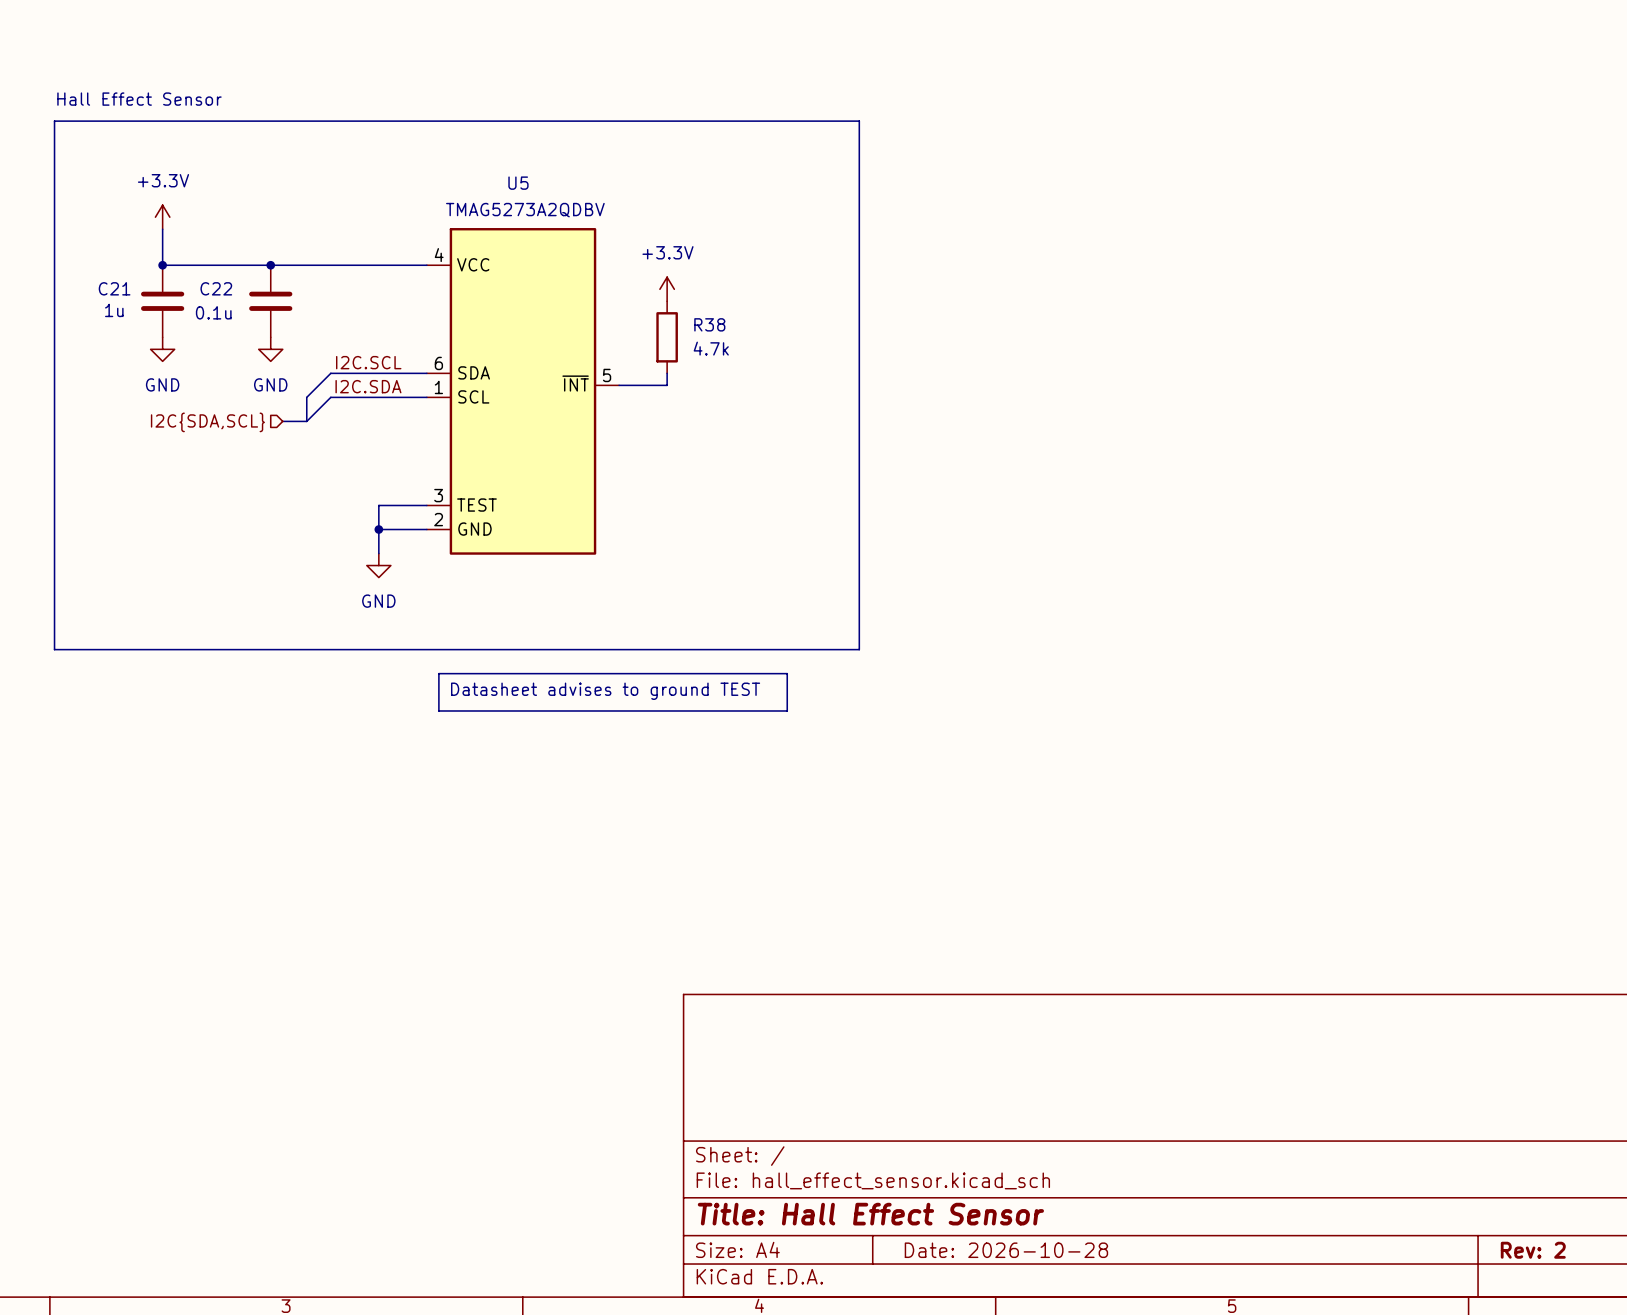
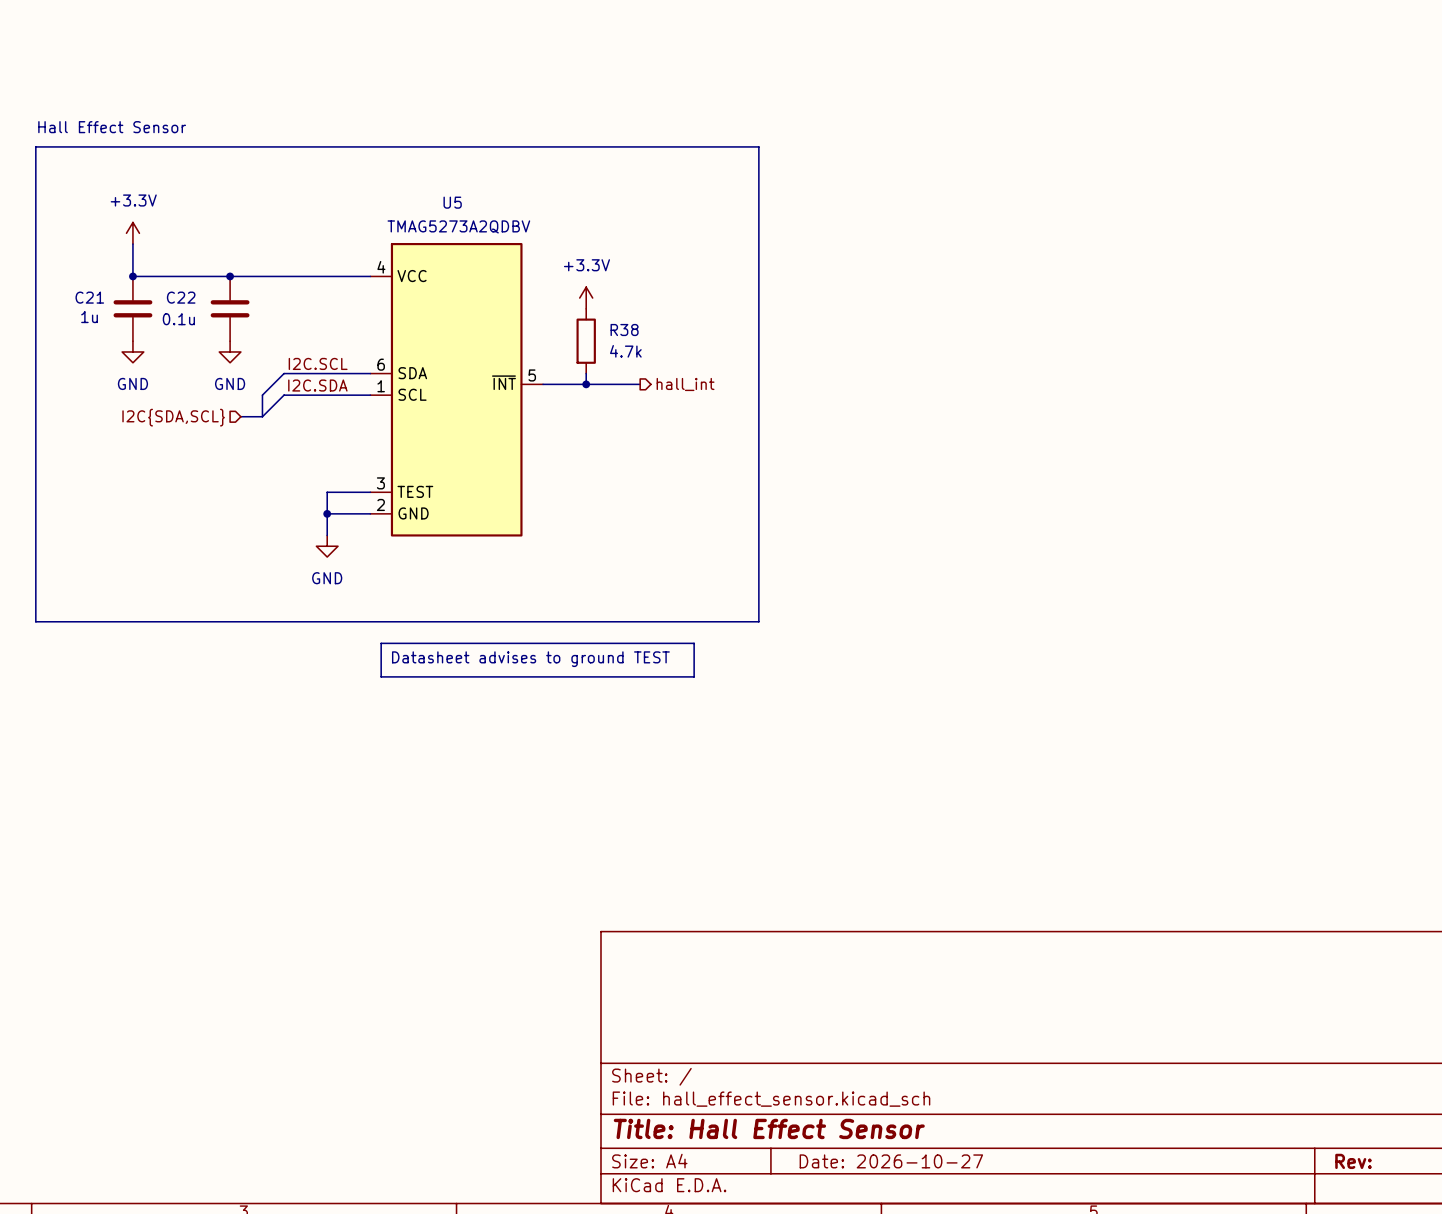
wire: none -> (586, 384) (640, 384)
junction: none -> (586, 384)
hierarchical label: none -> hall_int (685, 384)
title block: Date: 2026-10-28 (1006, 1250) -> Date: 2026-10-27 (891, 1161)
title block: Rev: 2 (1533, 1250) -> Rev: (1353, 1161)

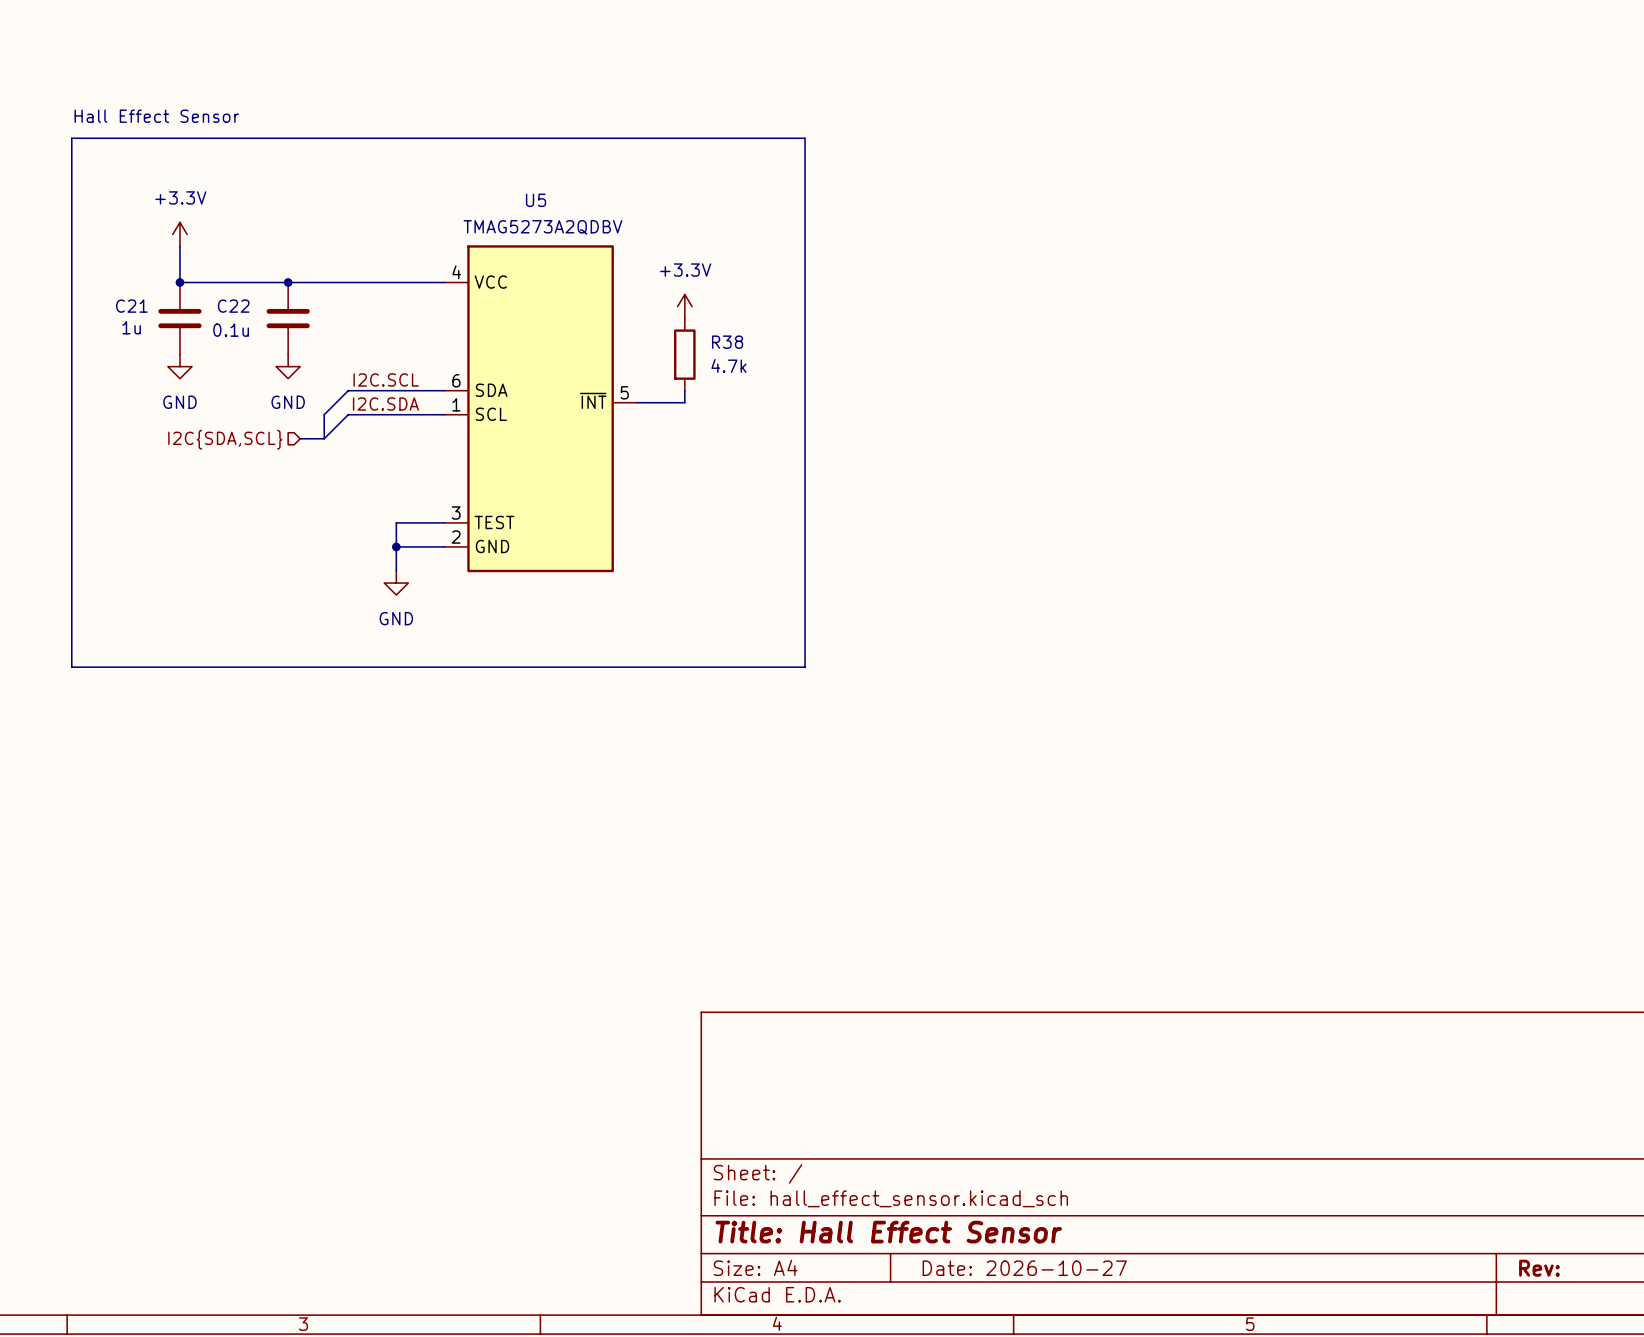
line: (694, 146) (758, 146) (758, 621) (694, 621) -> (805, 138) (805, 667)
wire: (586, 384) (640, 384) -> none
junction: (586, 384) -> none
hierarchical label: hall_int (685, 384) -> none
line: (381, 643) (694, 643) (694, 676) (381, 676) (381, 643) -> none
text: Datasheet advises to ground TEST (530, 659) -> none

